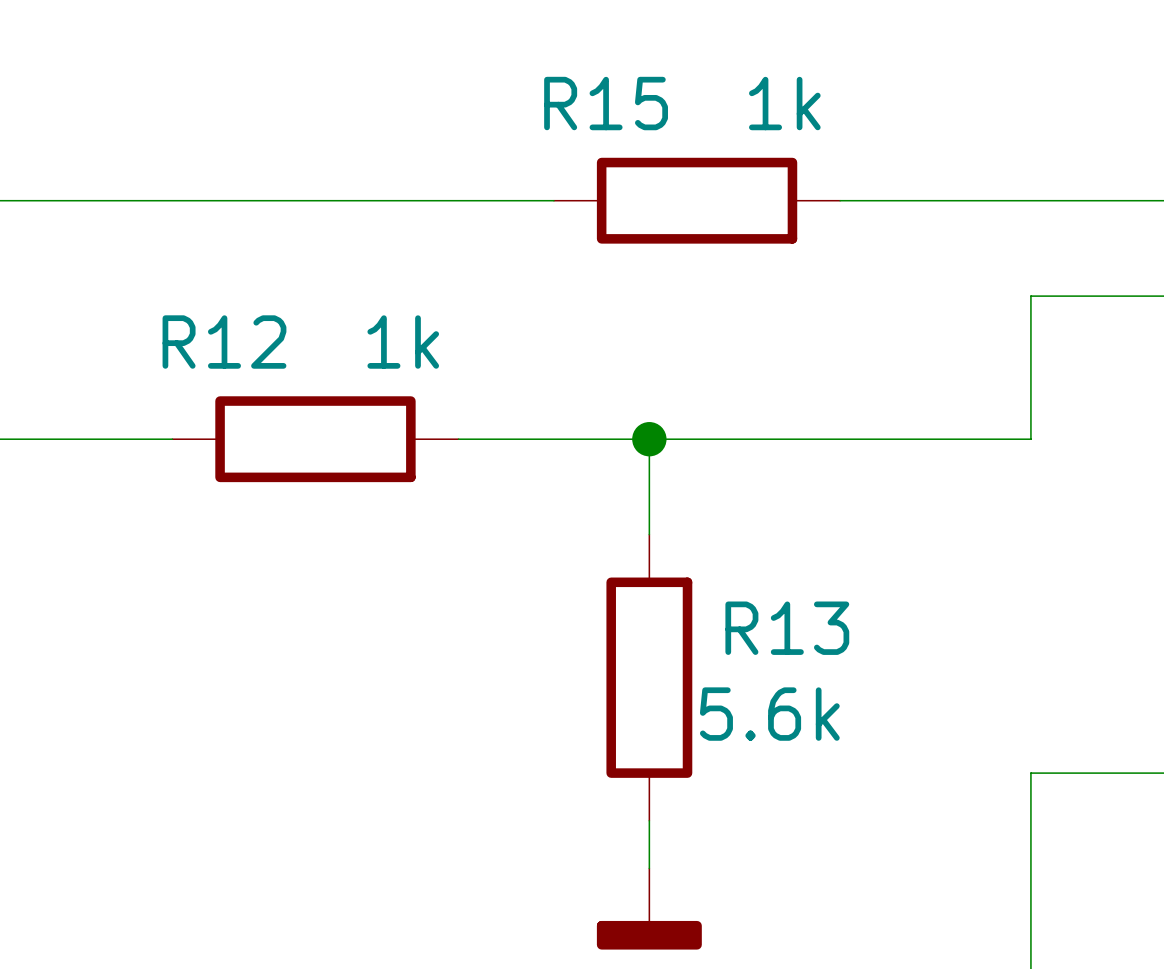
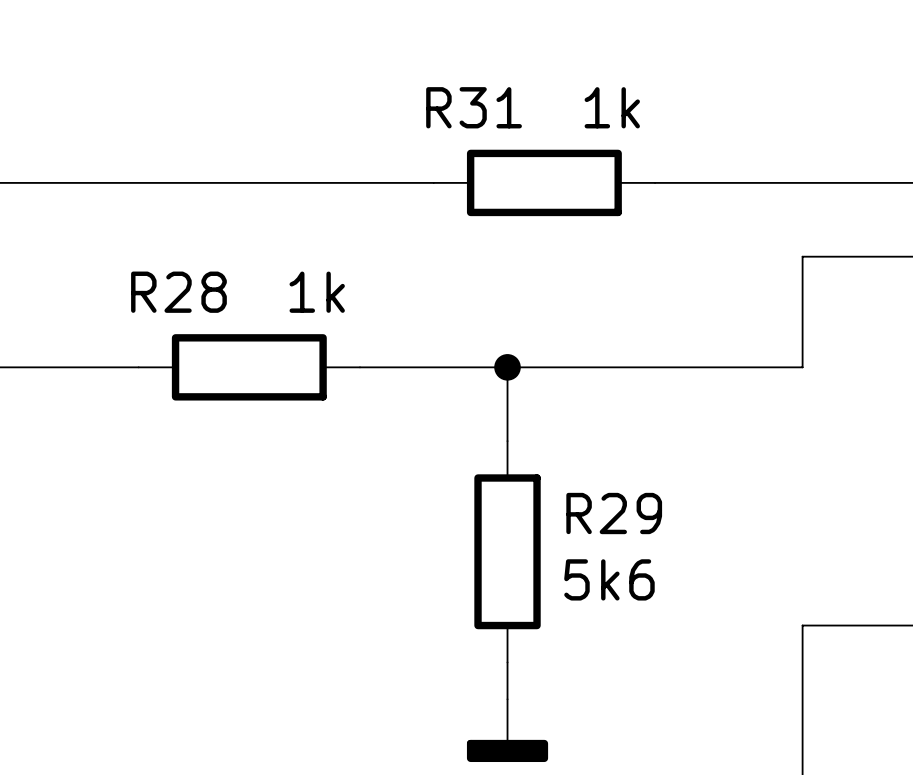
R15 name: R15 (606, 103) -> R31 (474, 107)
R12 name: R12 (224, 342) -> R28 (178, 292)
R13 name: R13 (787, 628) -> R29 (614, 513)
R13 value: 5.6k (769, 714) -> 5k6 (609, 579)

